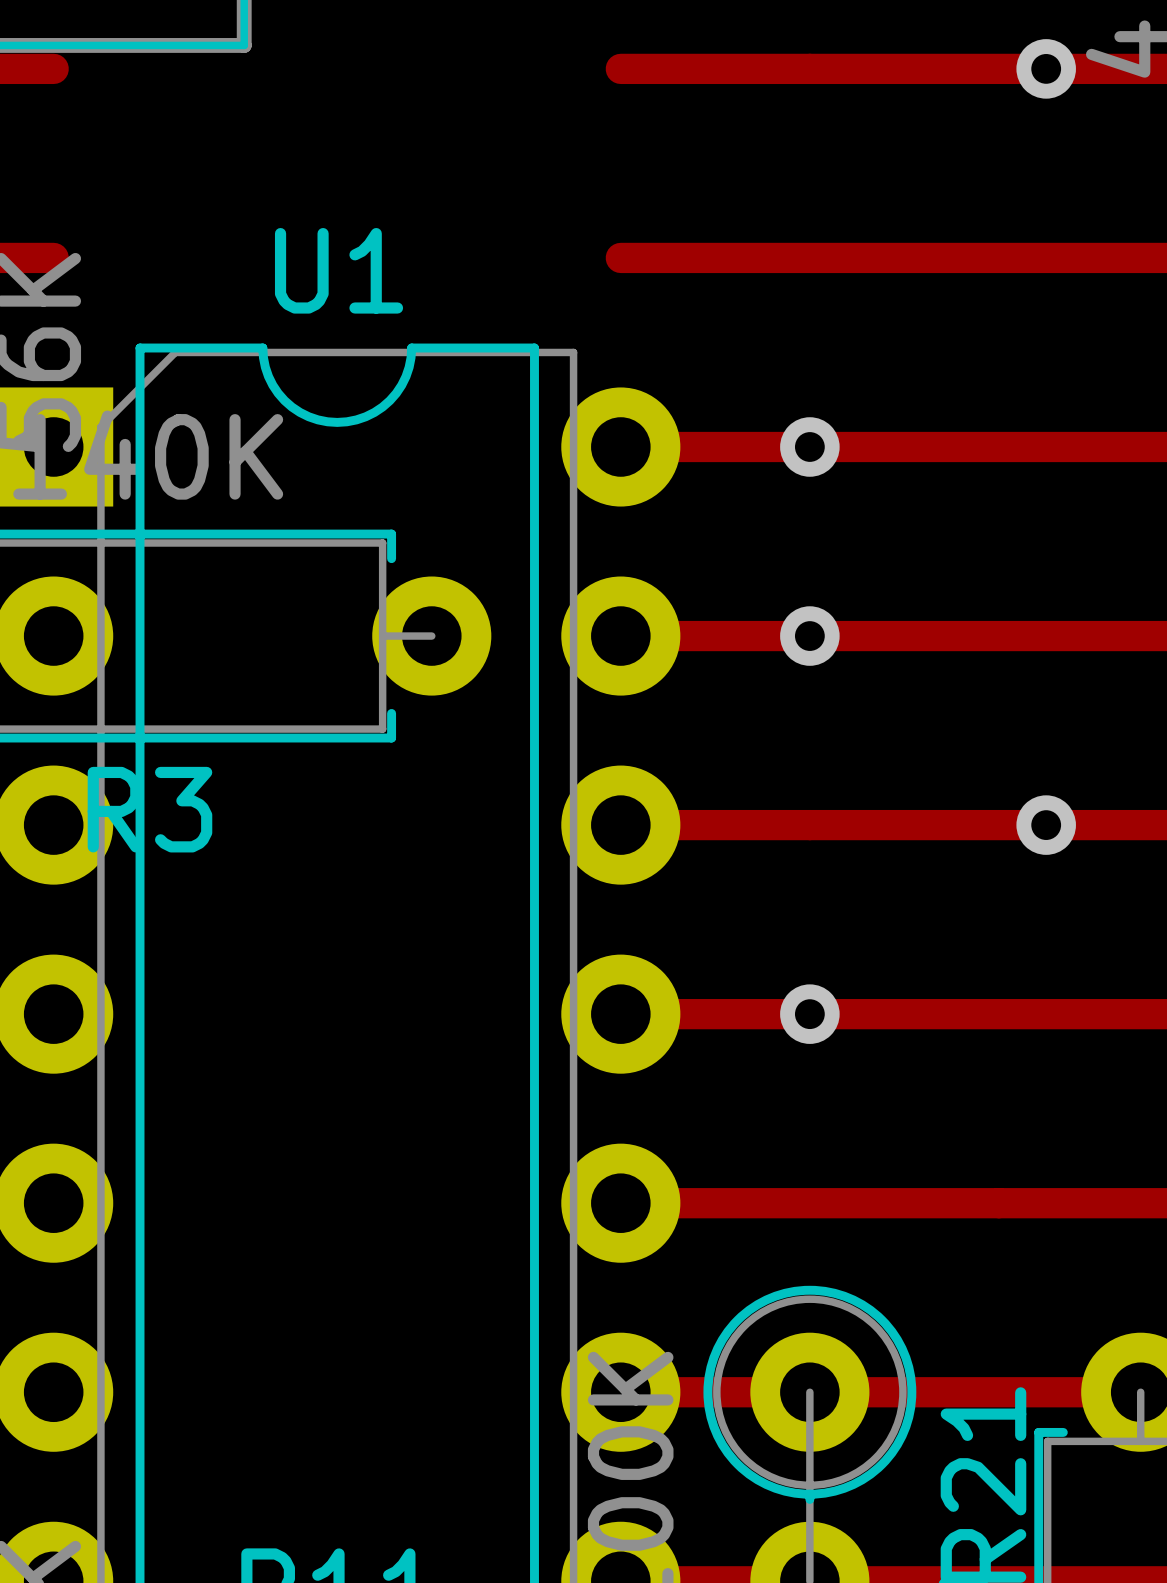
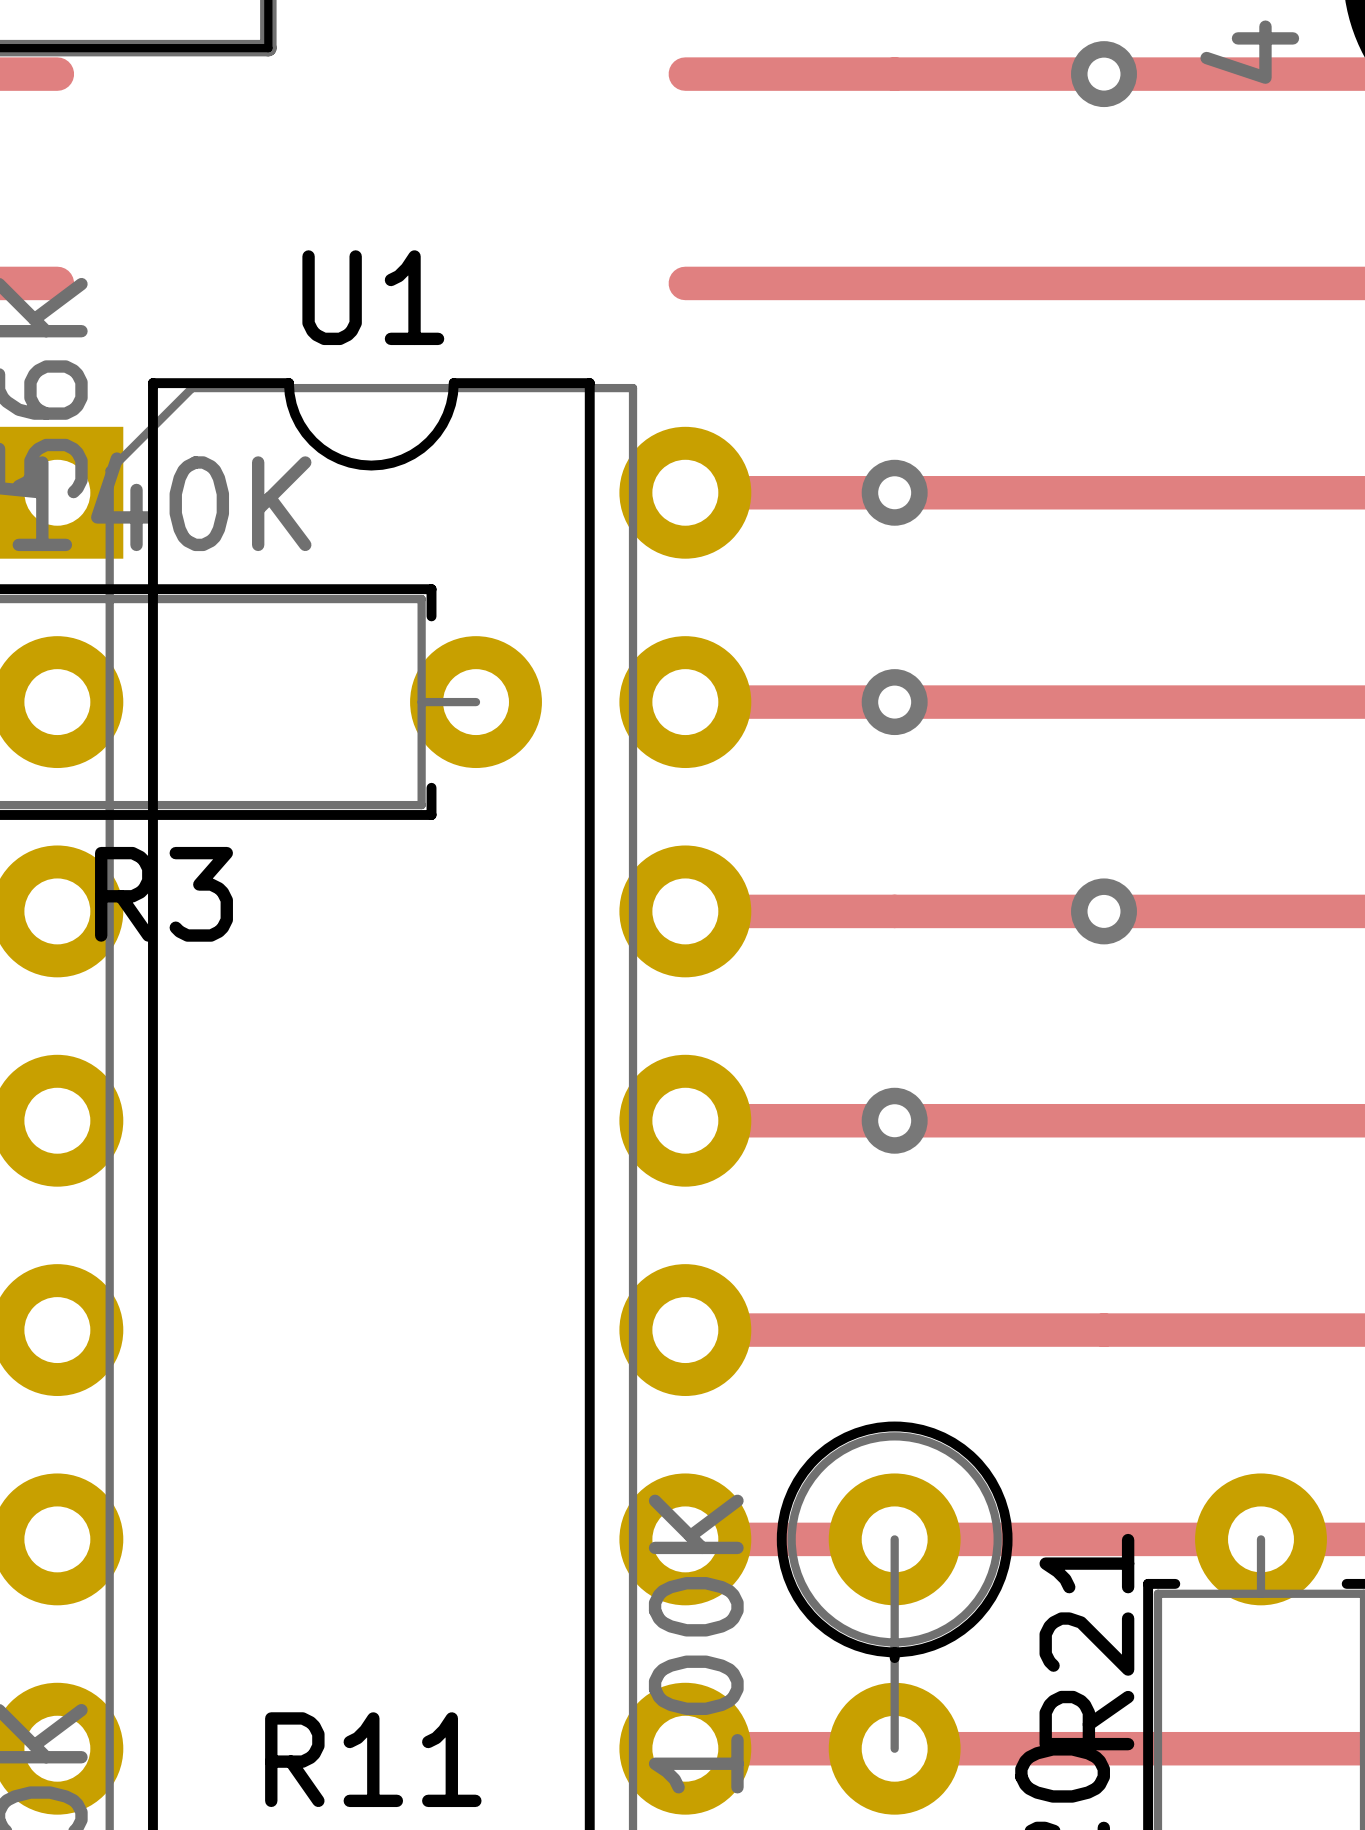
via position: (1046, 68) -> (1104, 74)
via position: (1046, 825) -> (1104, 911)

